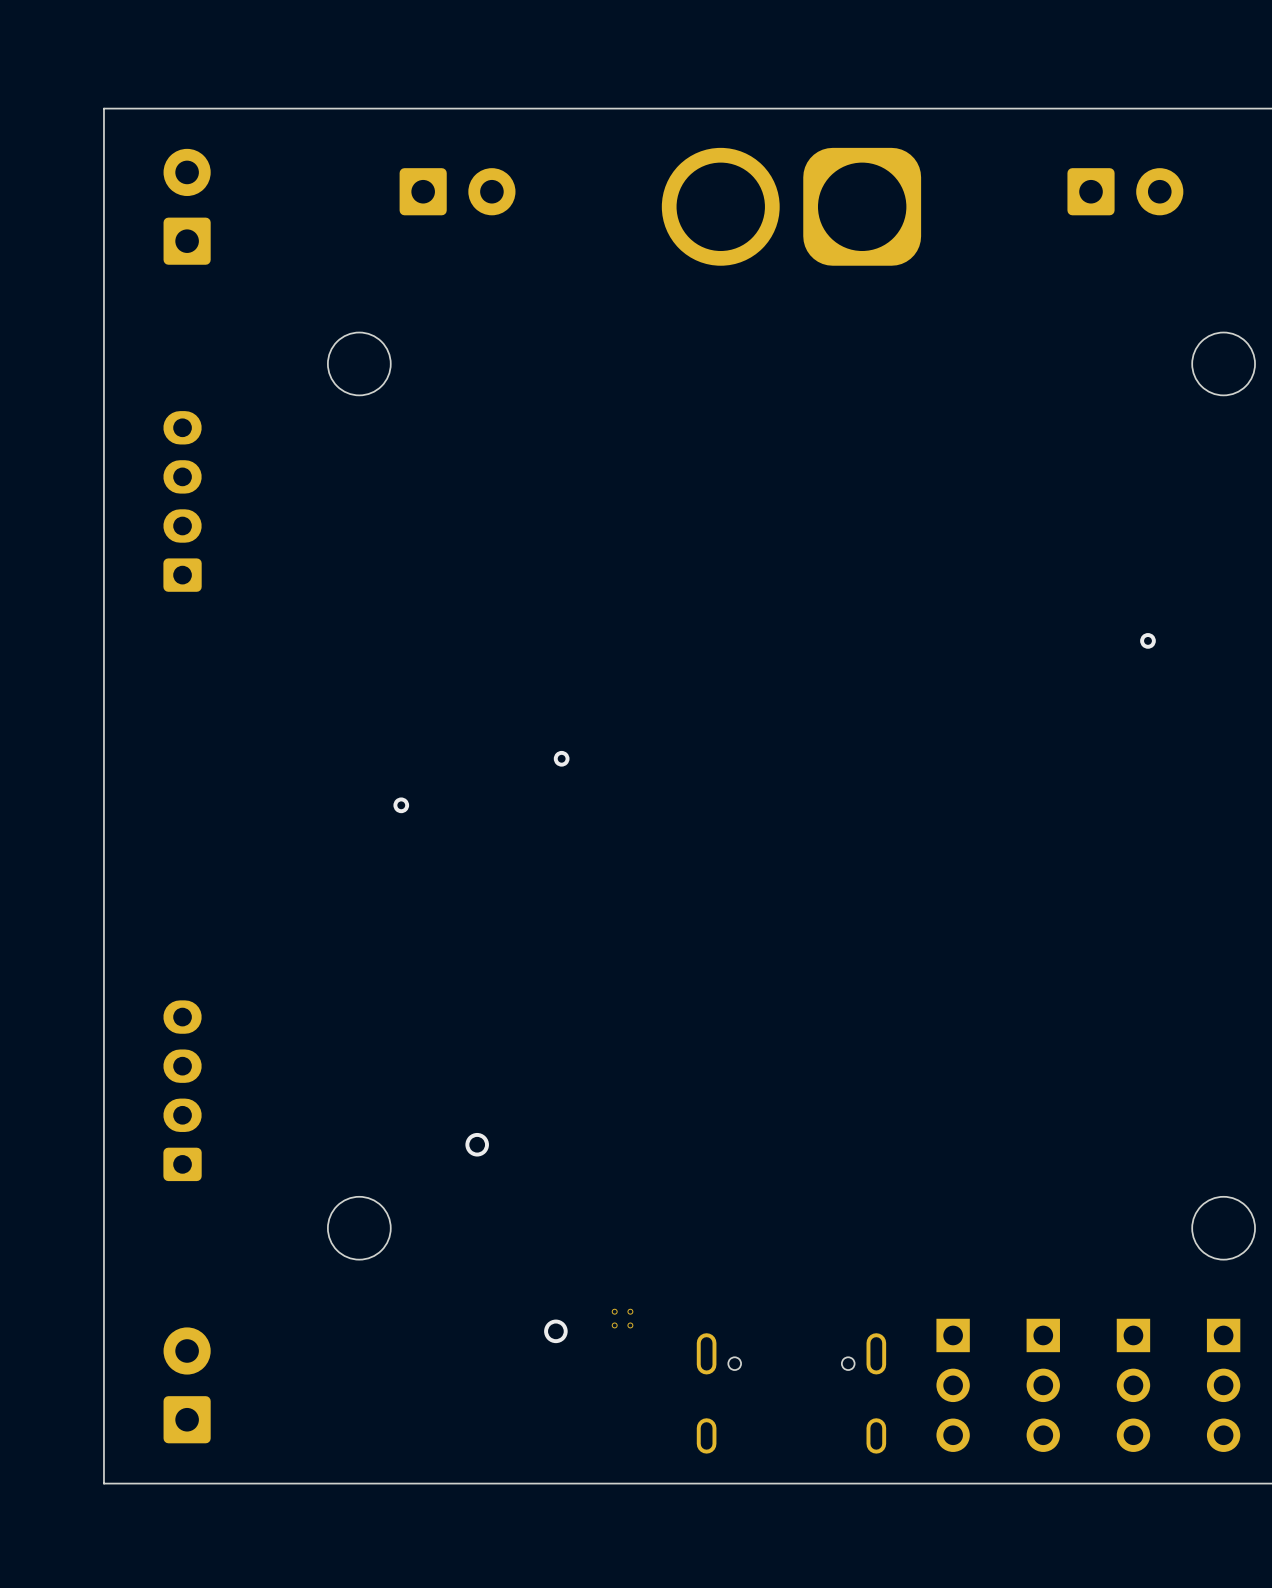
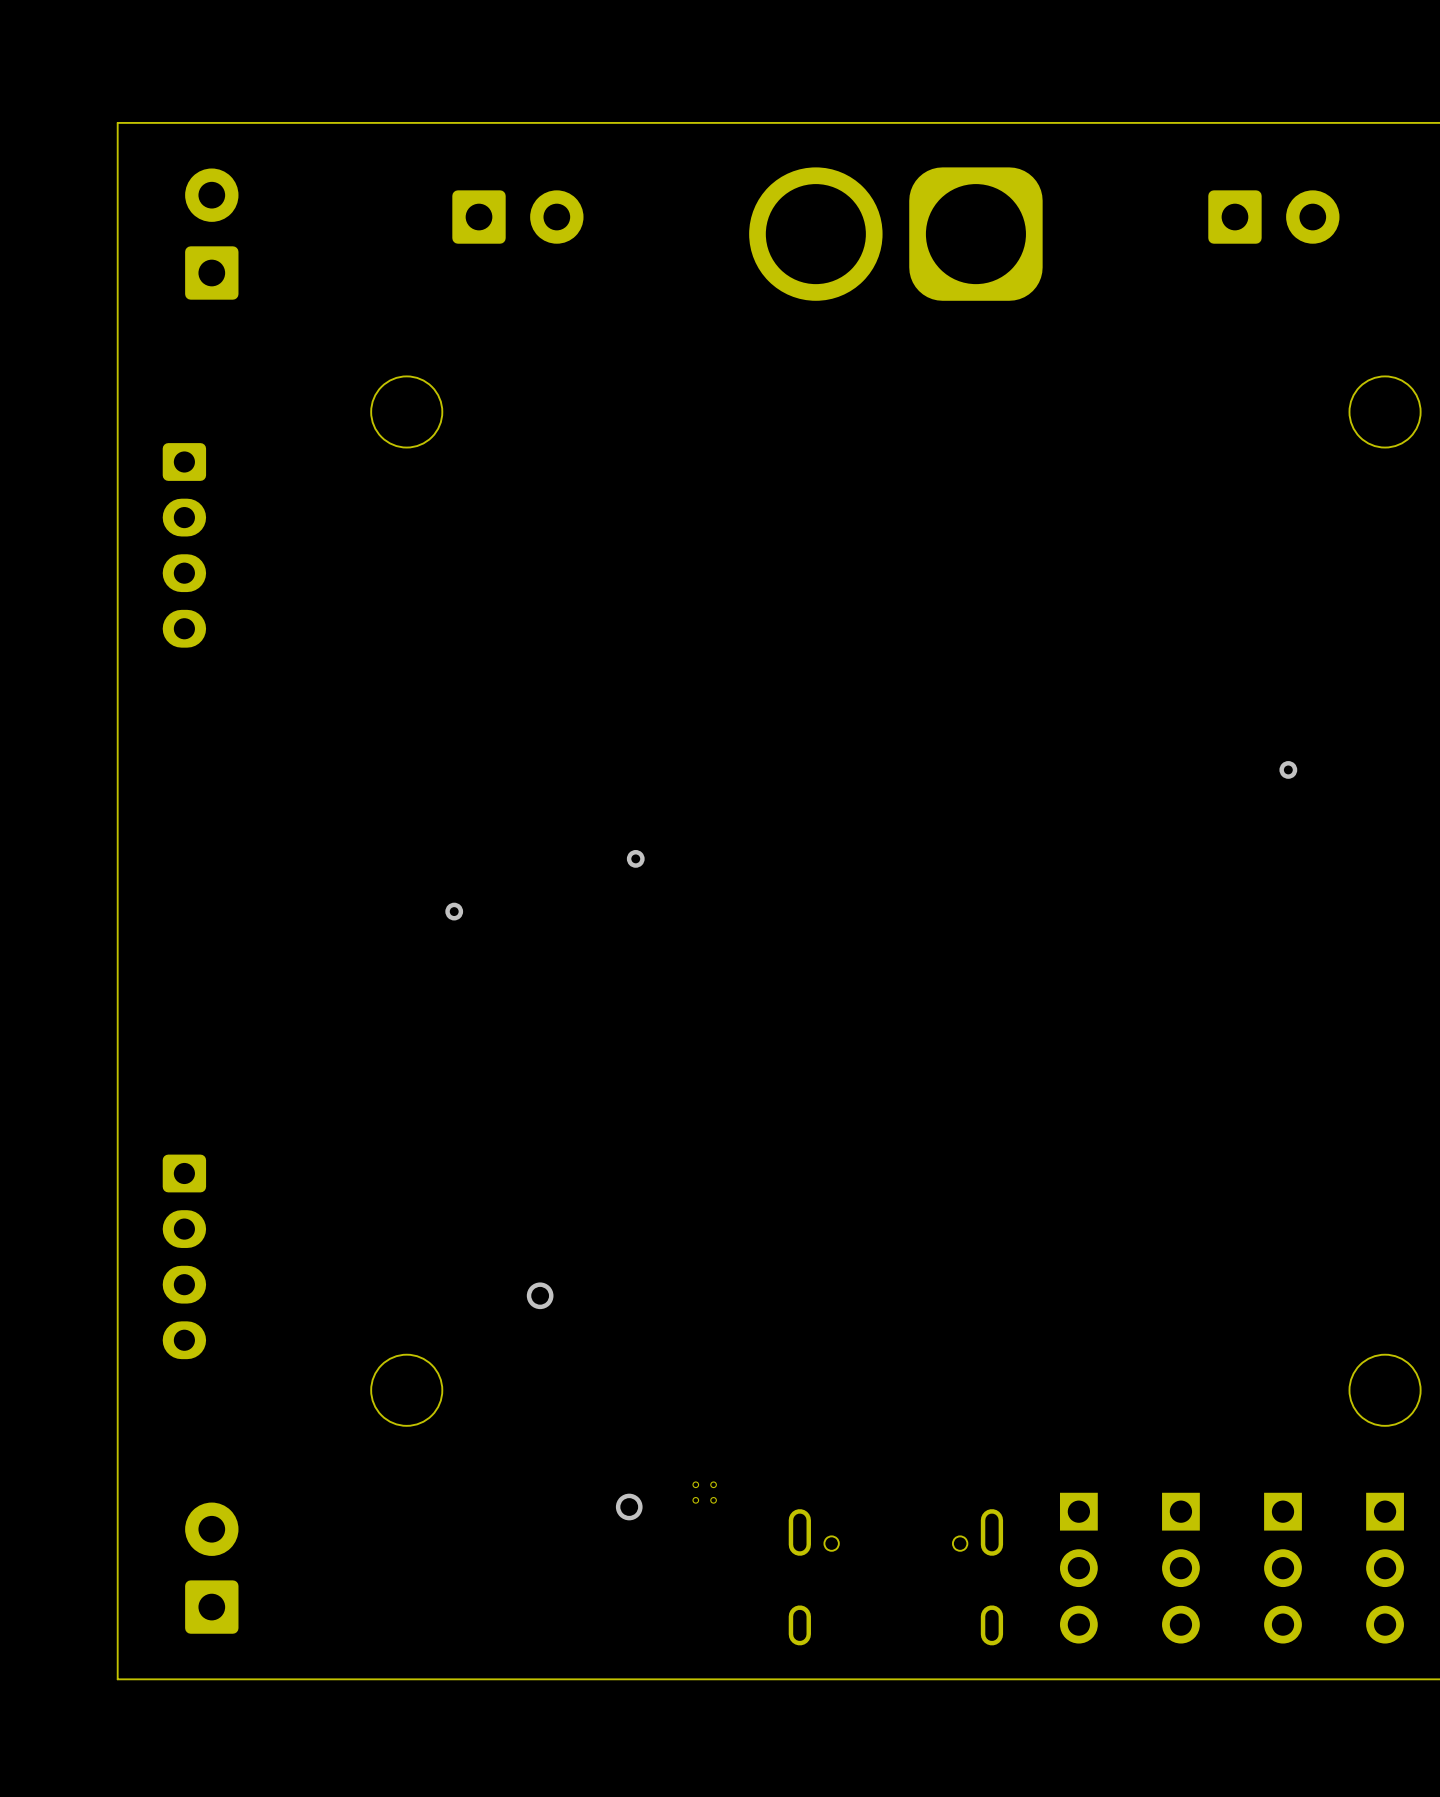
part rotation: 0° (182, 501) -> 180° (184, 545)
via position: (1147, 640) -> (1288, 769)
part rotation: 0° (182, 1090) -> 180° (184, 1256)

